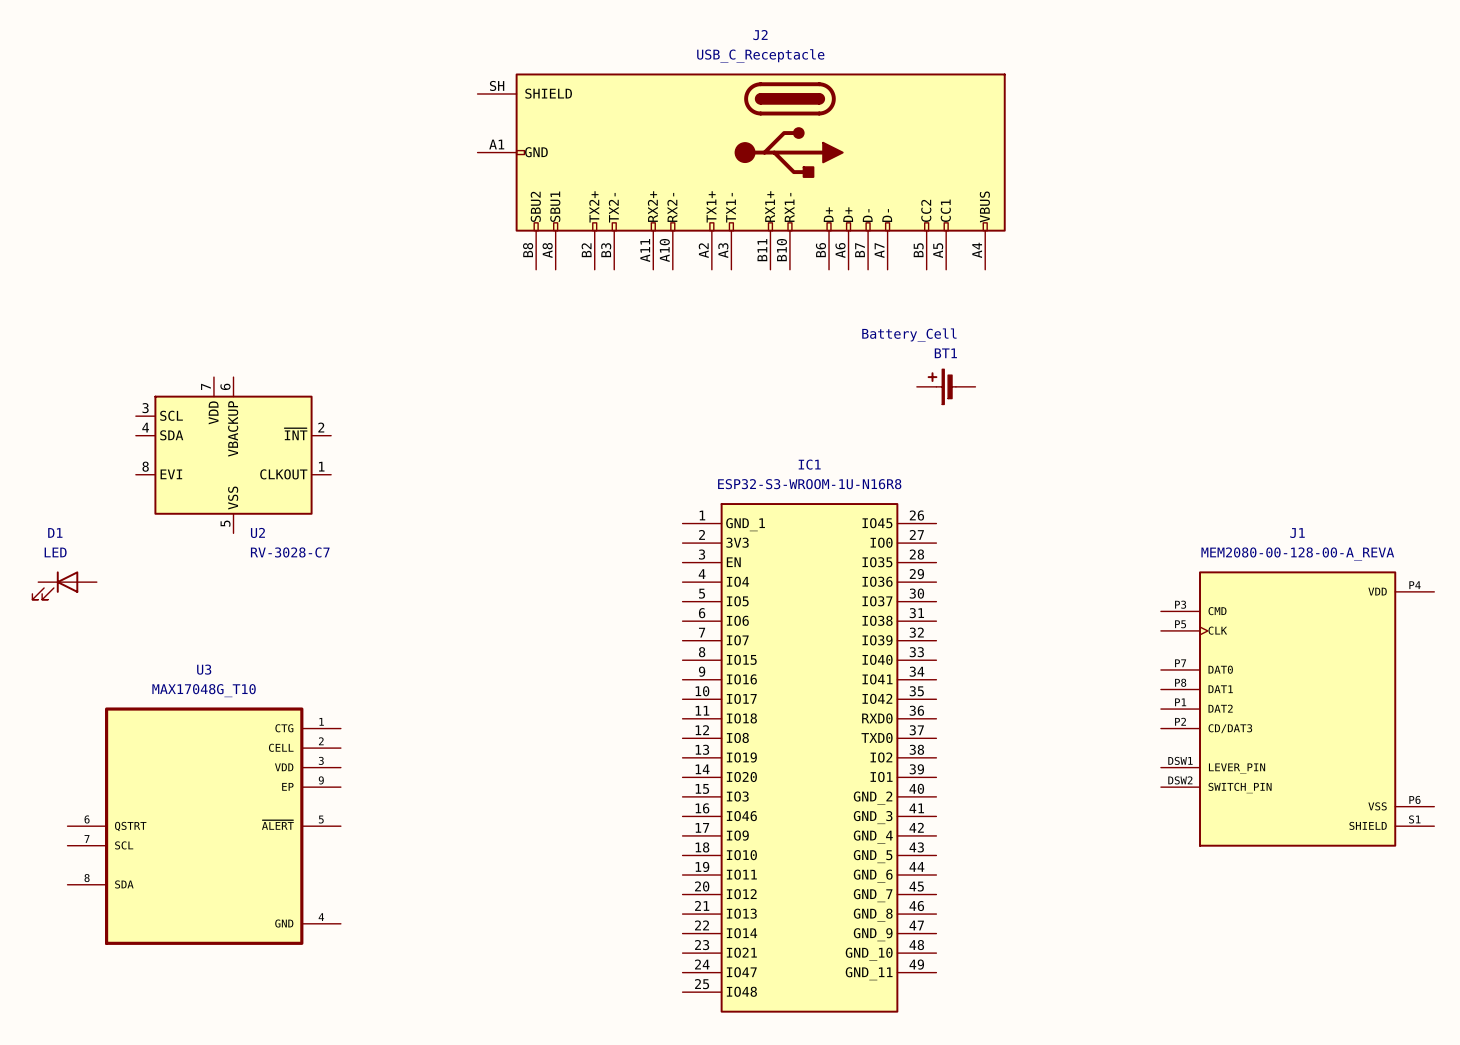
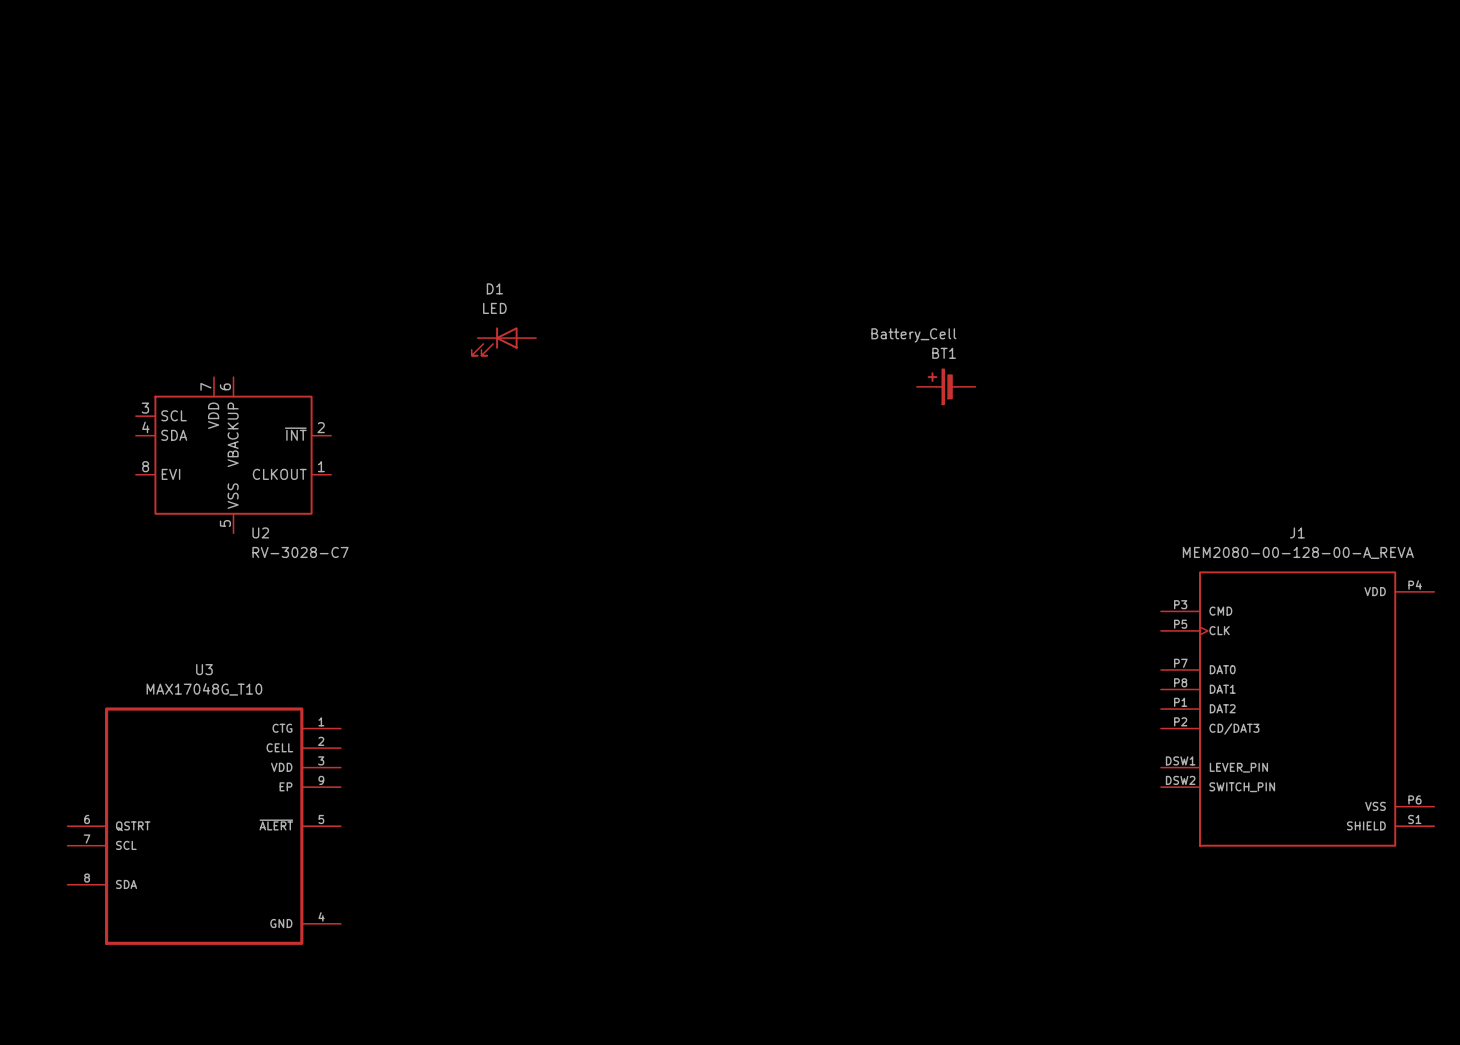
J2: USB_C_Receptacle (741, 171) -> none
D1 position: (64, 585) -> (503, 341)
IC1: ESP32-S3-WROOM-1U-N16R8 (809, 757) -> none

